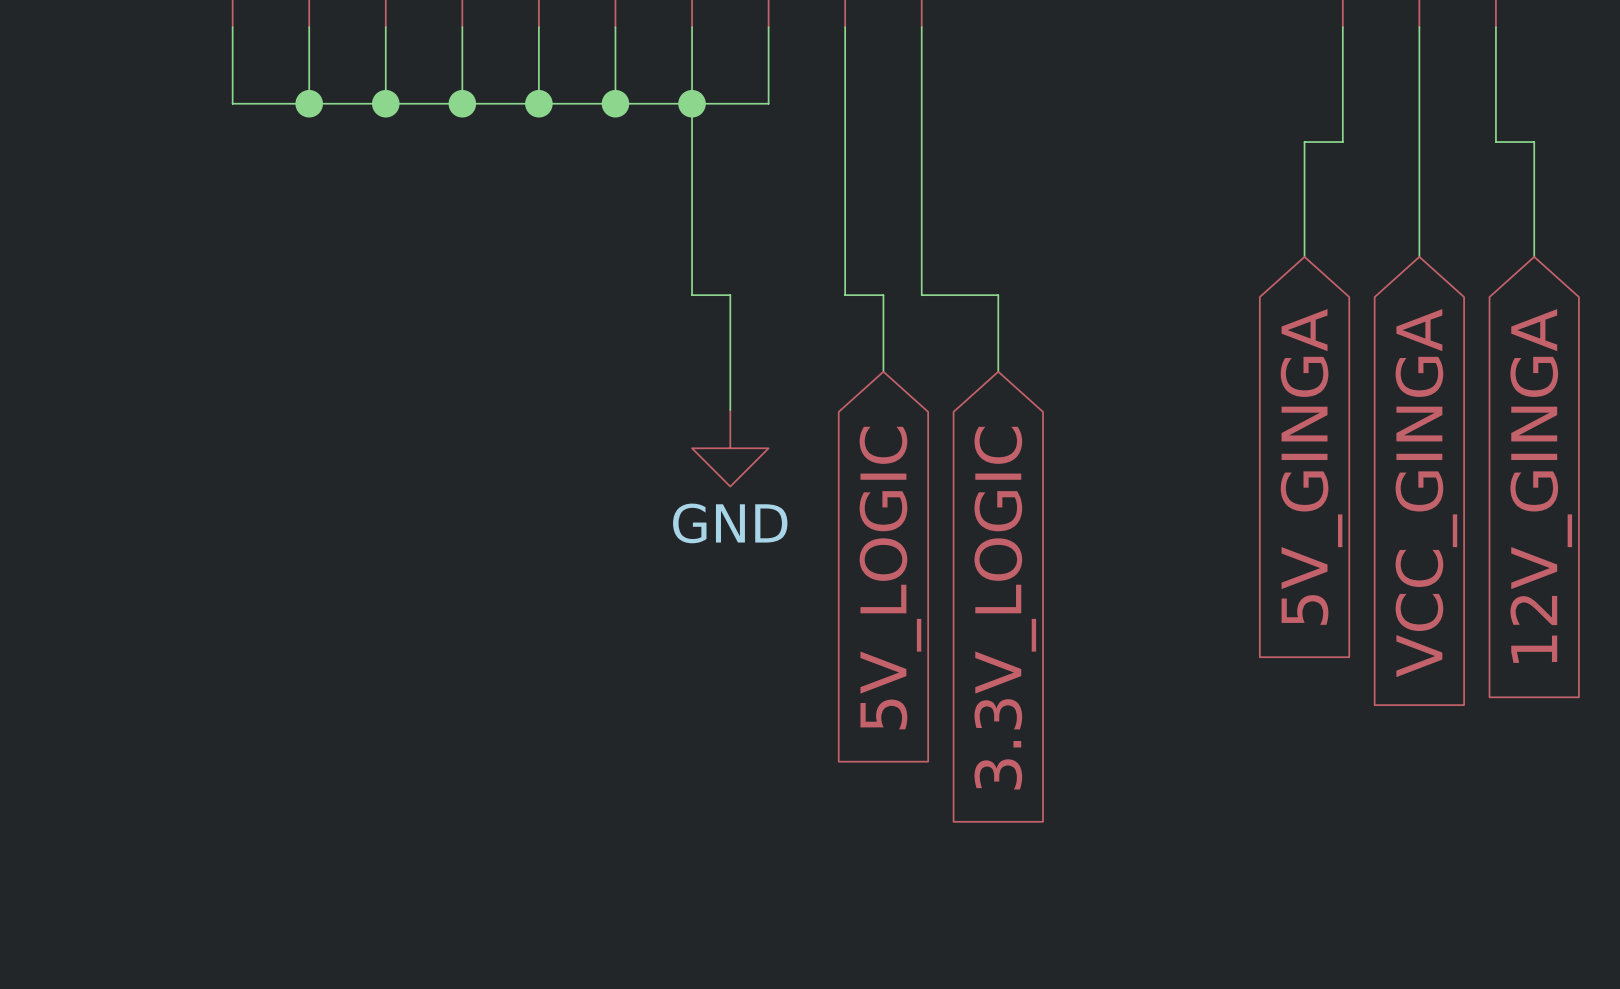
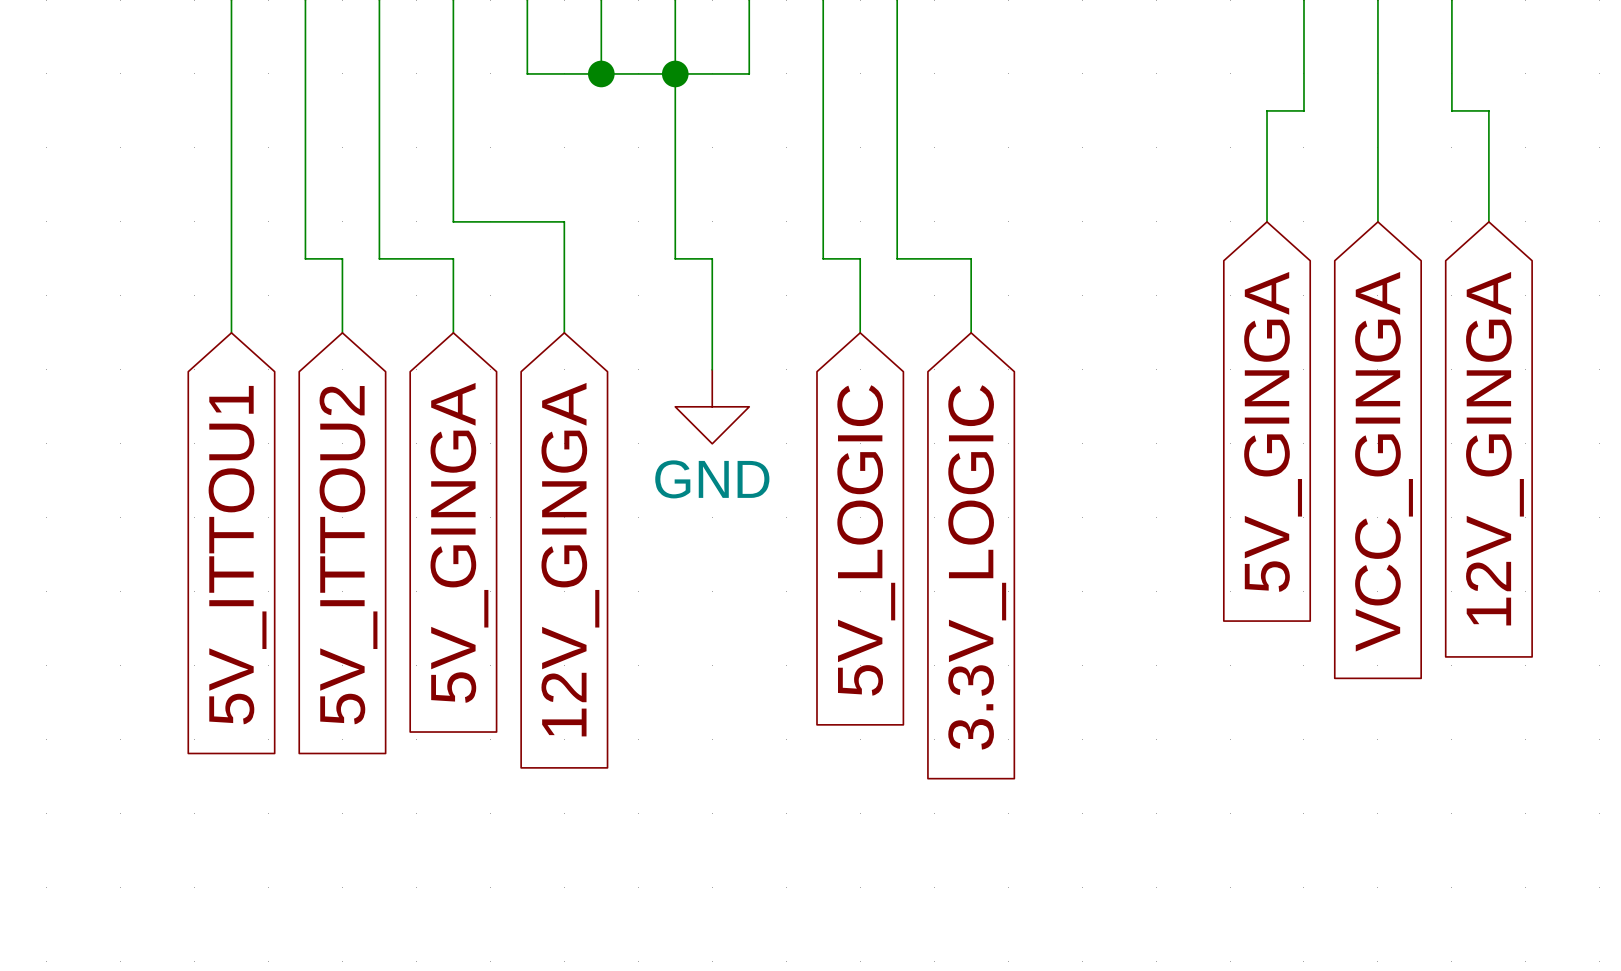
wire: (232, 103) (538, 103) -> (231, 73) (231, 332)
wire: none -> (305, 73) (305, 258) (342, 258) (342, 332)
junction: (309, 103) -> none
wire: none -> (379, 73) (379, 258) (453, 258) (453, 332)
junction: (385, 103) -> none
wire: none -> (453, 73) (453, 221) (564, 221) (564, 332)
junction: (462, 103) -> none
junction: (538, 103) -> none
global label: none -> 5V_GINGA (459, 542)
global label: none -> 5V_ITTOU1 (237, 555)
global label: none -> 5V_ITTOU2 (348, 555)
global label: none -> 12V_GINGA (570, 559)

